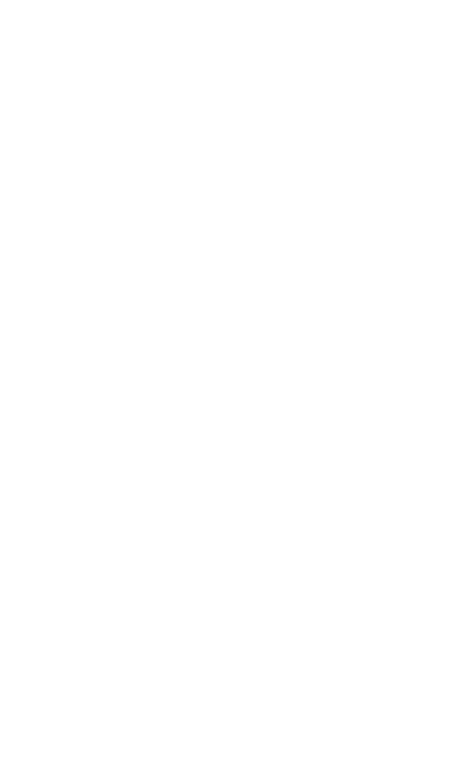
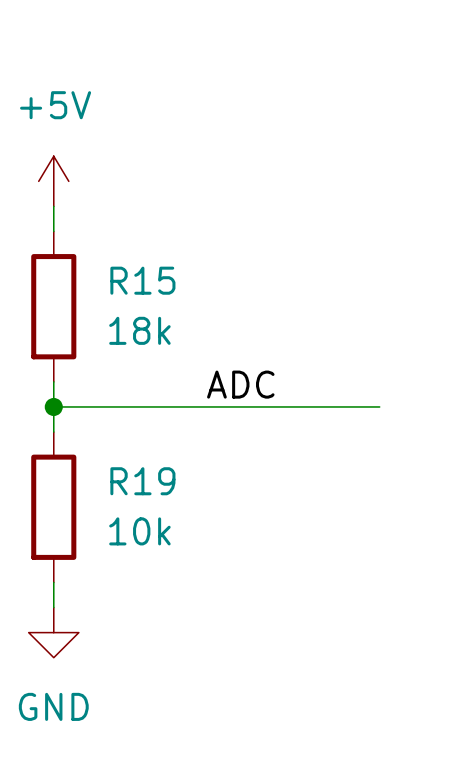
power symbol: none -> +5V (53, 181)
wire: none -> (53, 206) (53, 231)
R15: none -> 18k (53, 306)
wire: none -> (53, 381) (53, 432)
label: none -> ADC (240, 384)
wire: none -> (53, 406) (379, 406)
junction: none -> (53, 406)
R19: none -> 10k (53, 507)
wire: none -> (53, 582) (53, 607)
power symbol: none -> GND (53, 632)

